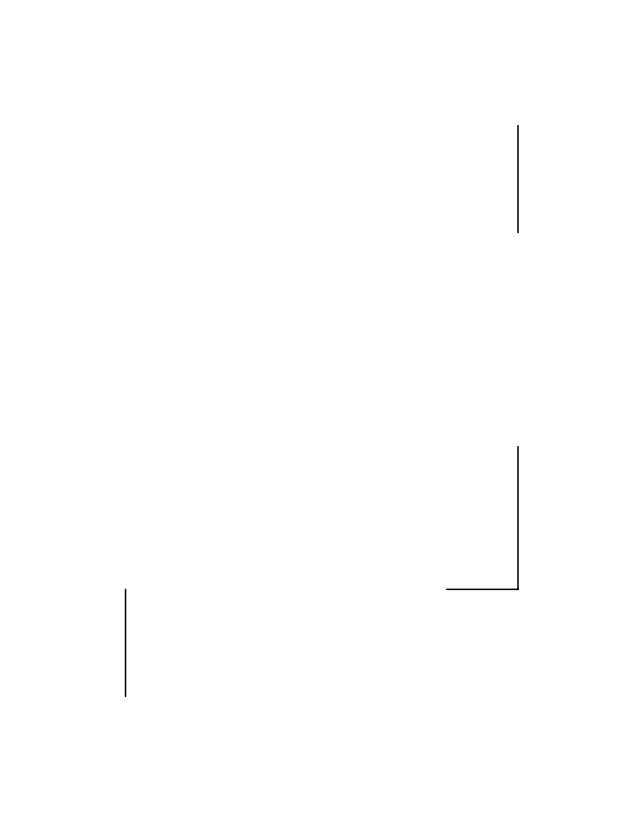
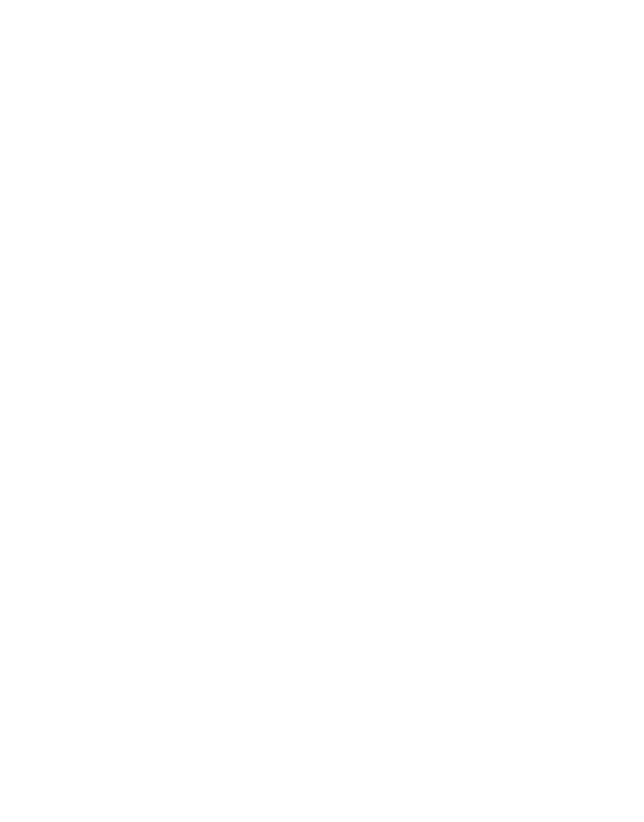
wire: (517, 125) (517, 232) -> none
wire: (517, 446) (517, 589) (446, 589) -> none
wire: (125, 589) (125, 696) -> none

